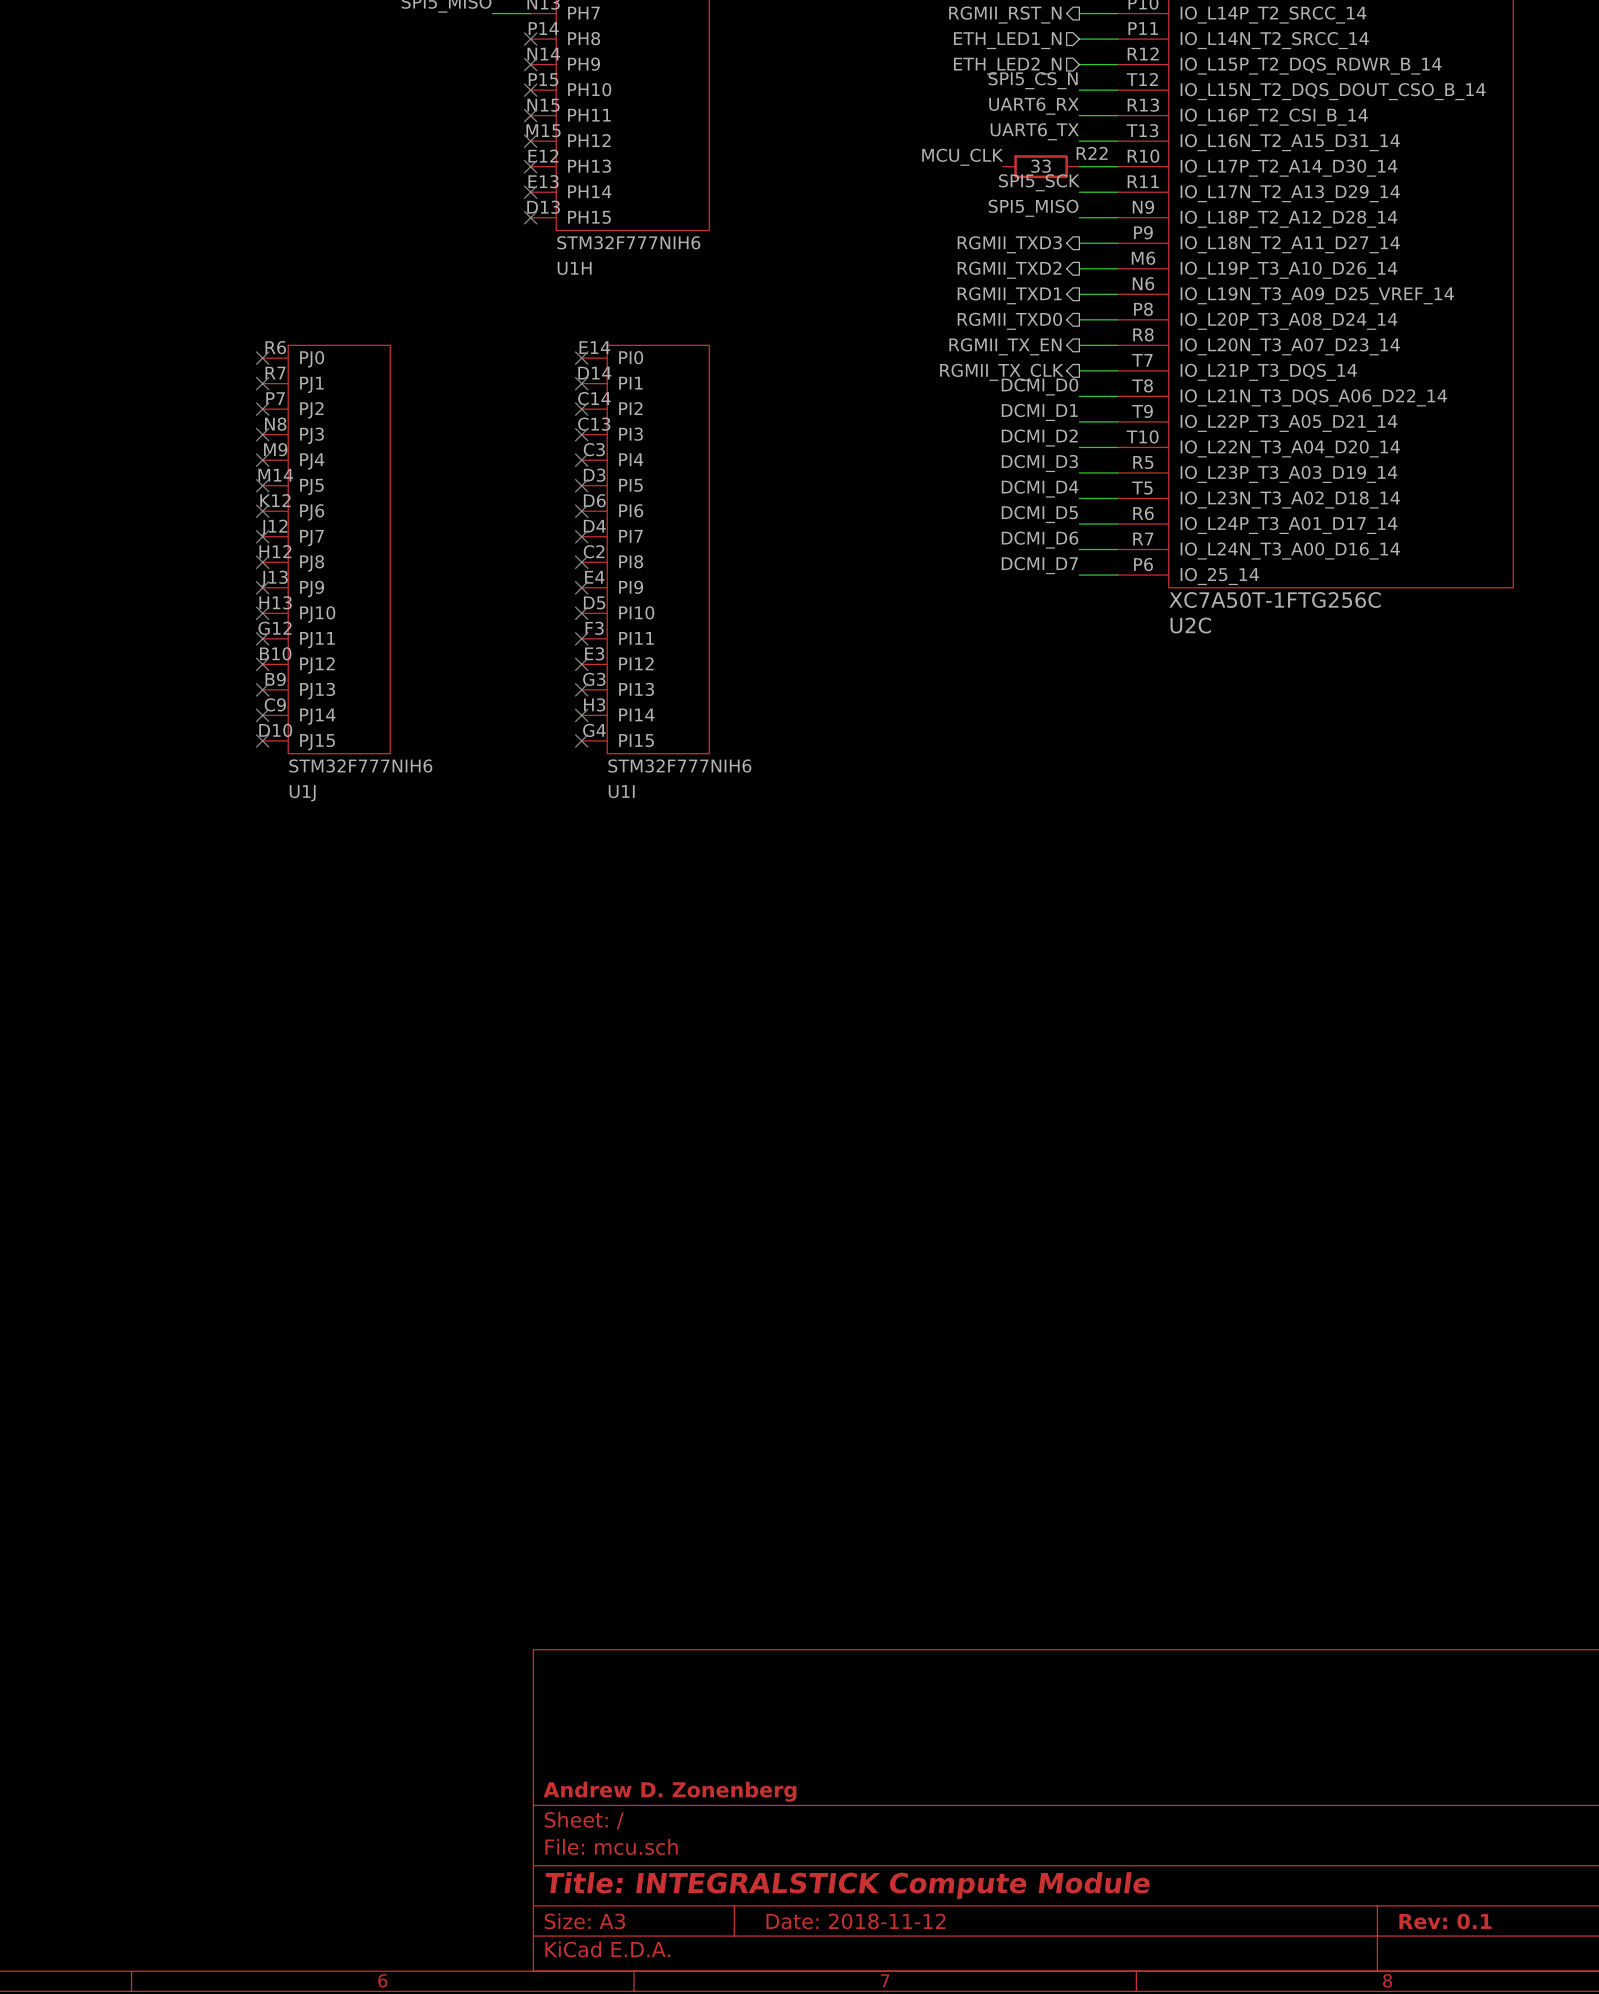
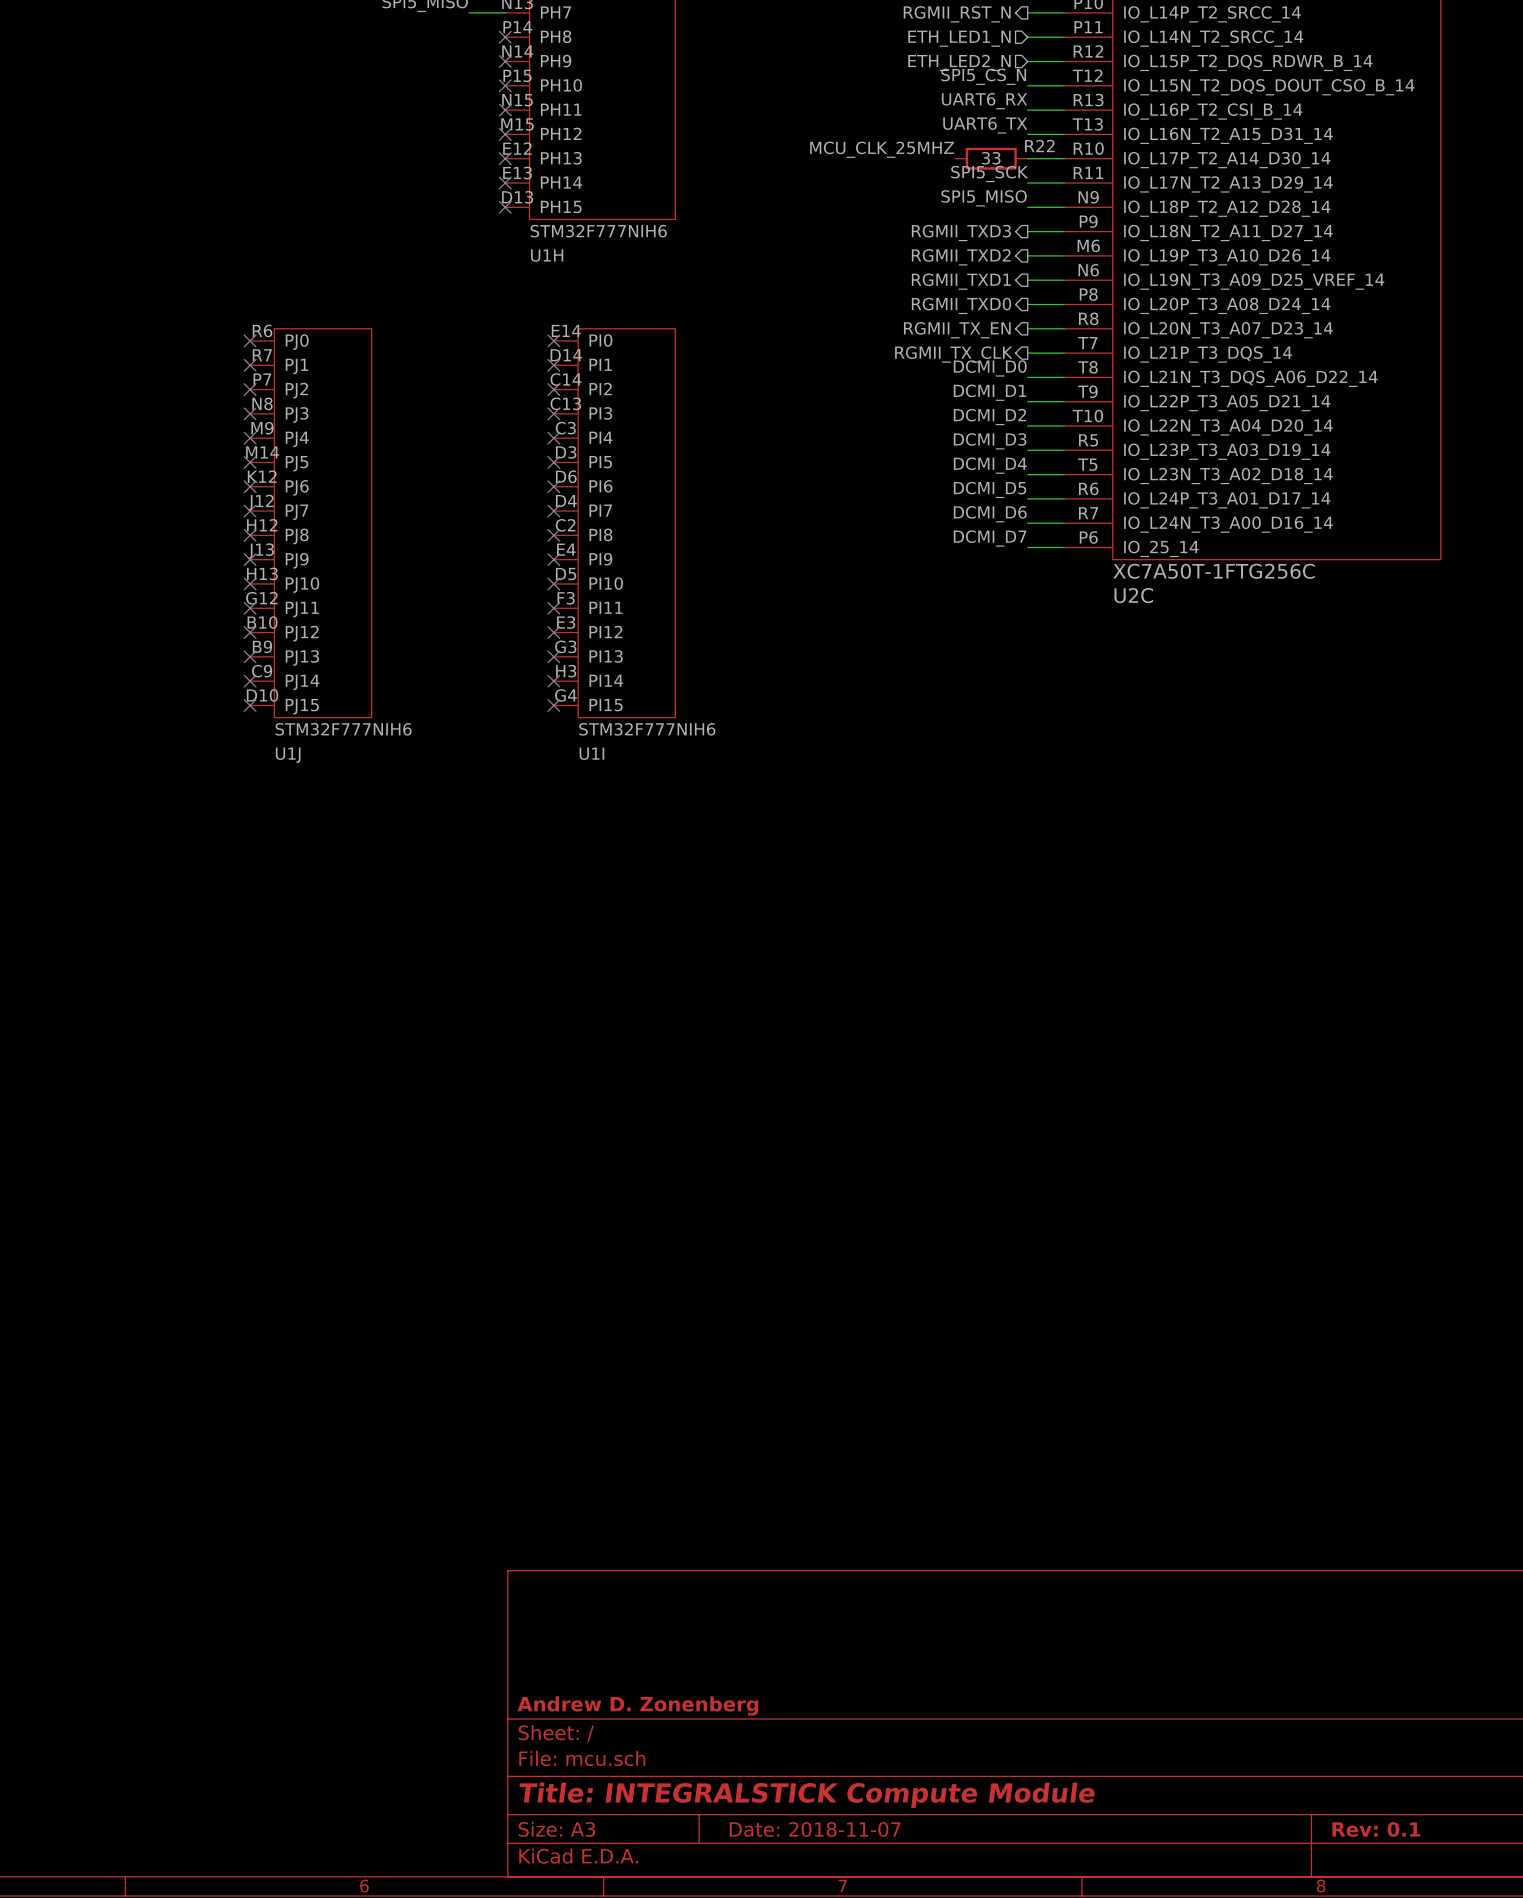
label: MCU_CLK (962, 157) -> MCU_CLK_25MHZ (882, 149)
title block: Date: 2018-11-12 (856, 1921) -> Date: 2018-11-07 (815, 1829)

